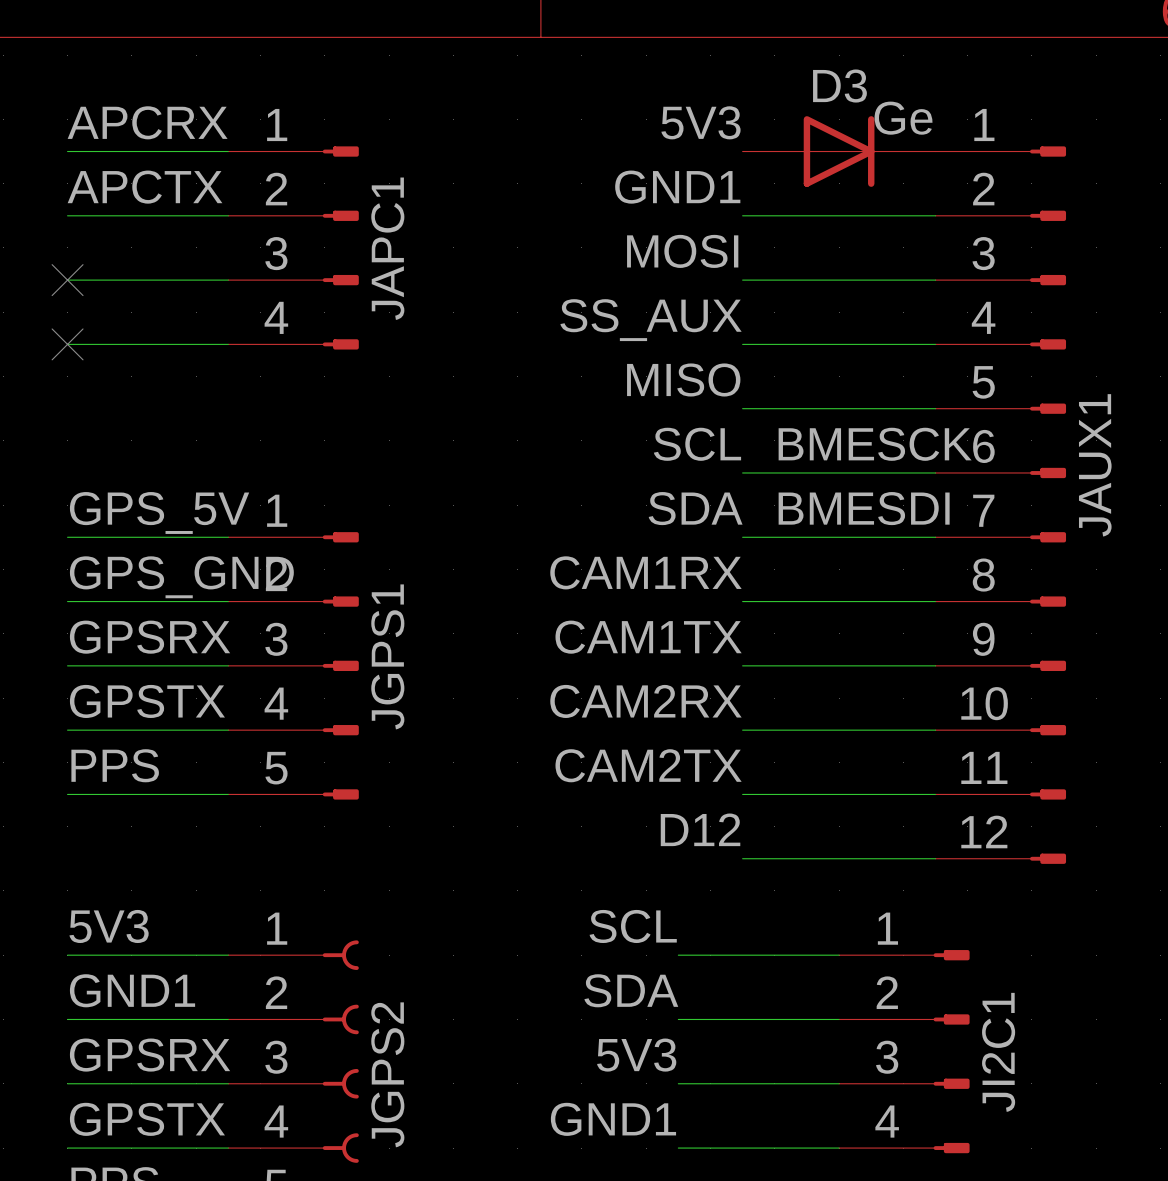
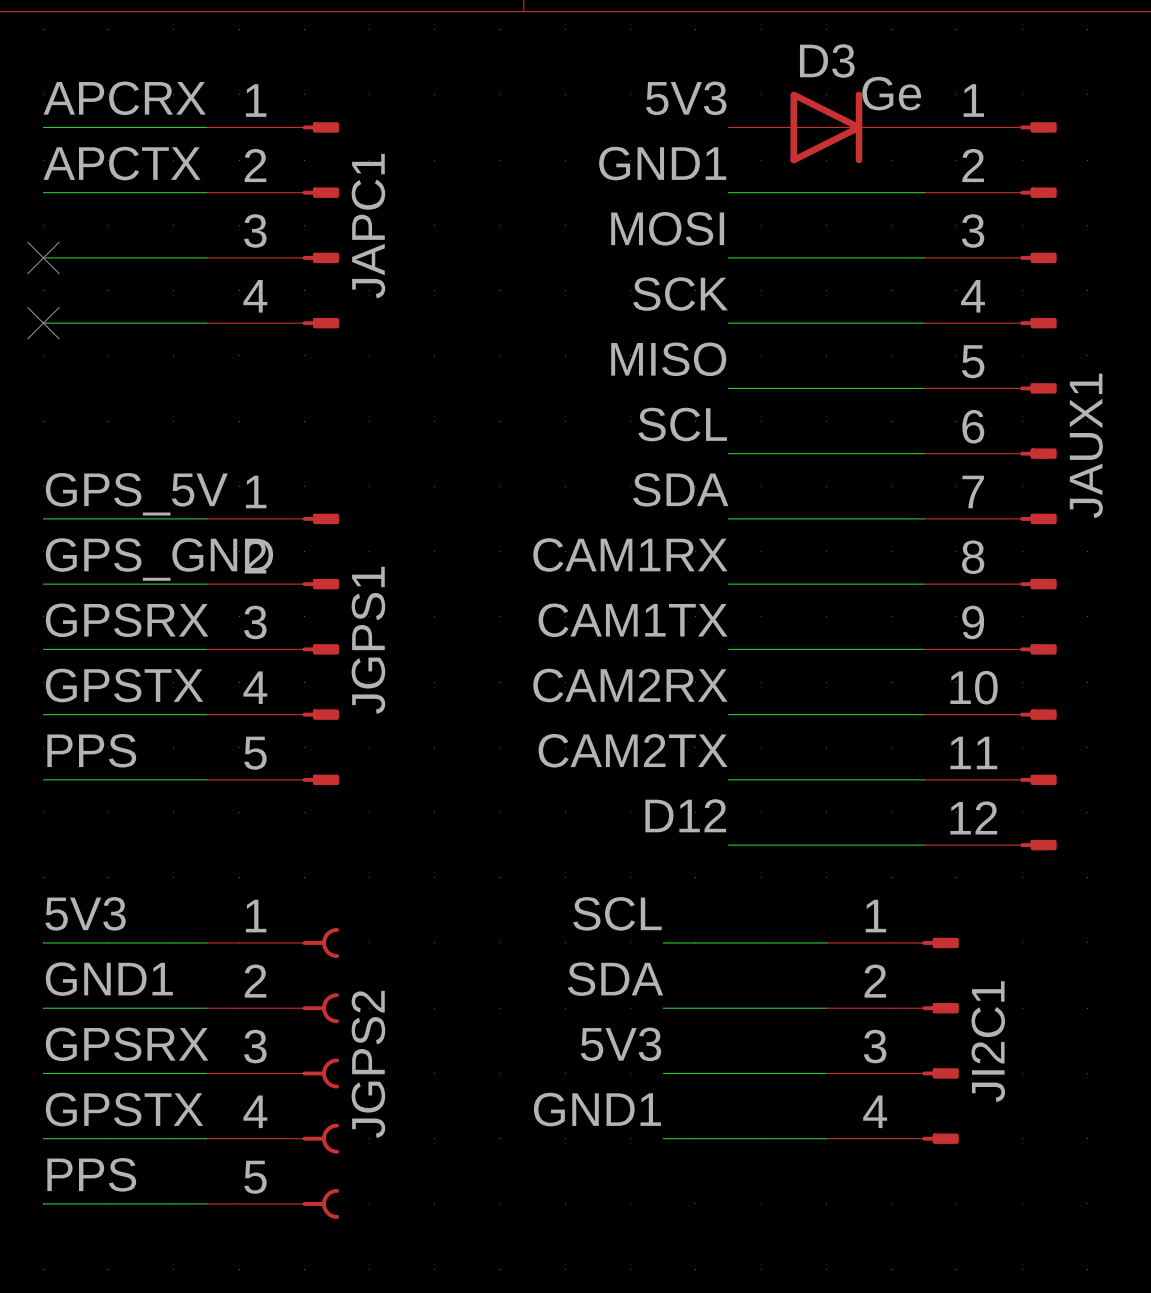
label: SS_AUX (651, 320) -> SCK (680, 294)
label: BMESCK (875, 444) -> none
label: BMESDI (864, 508) -> none

